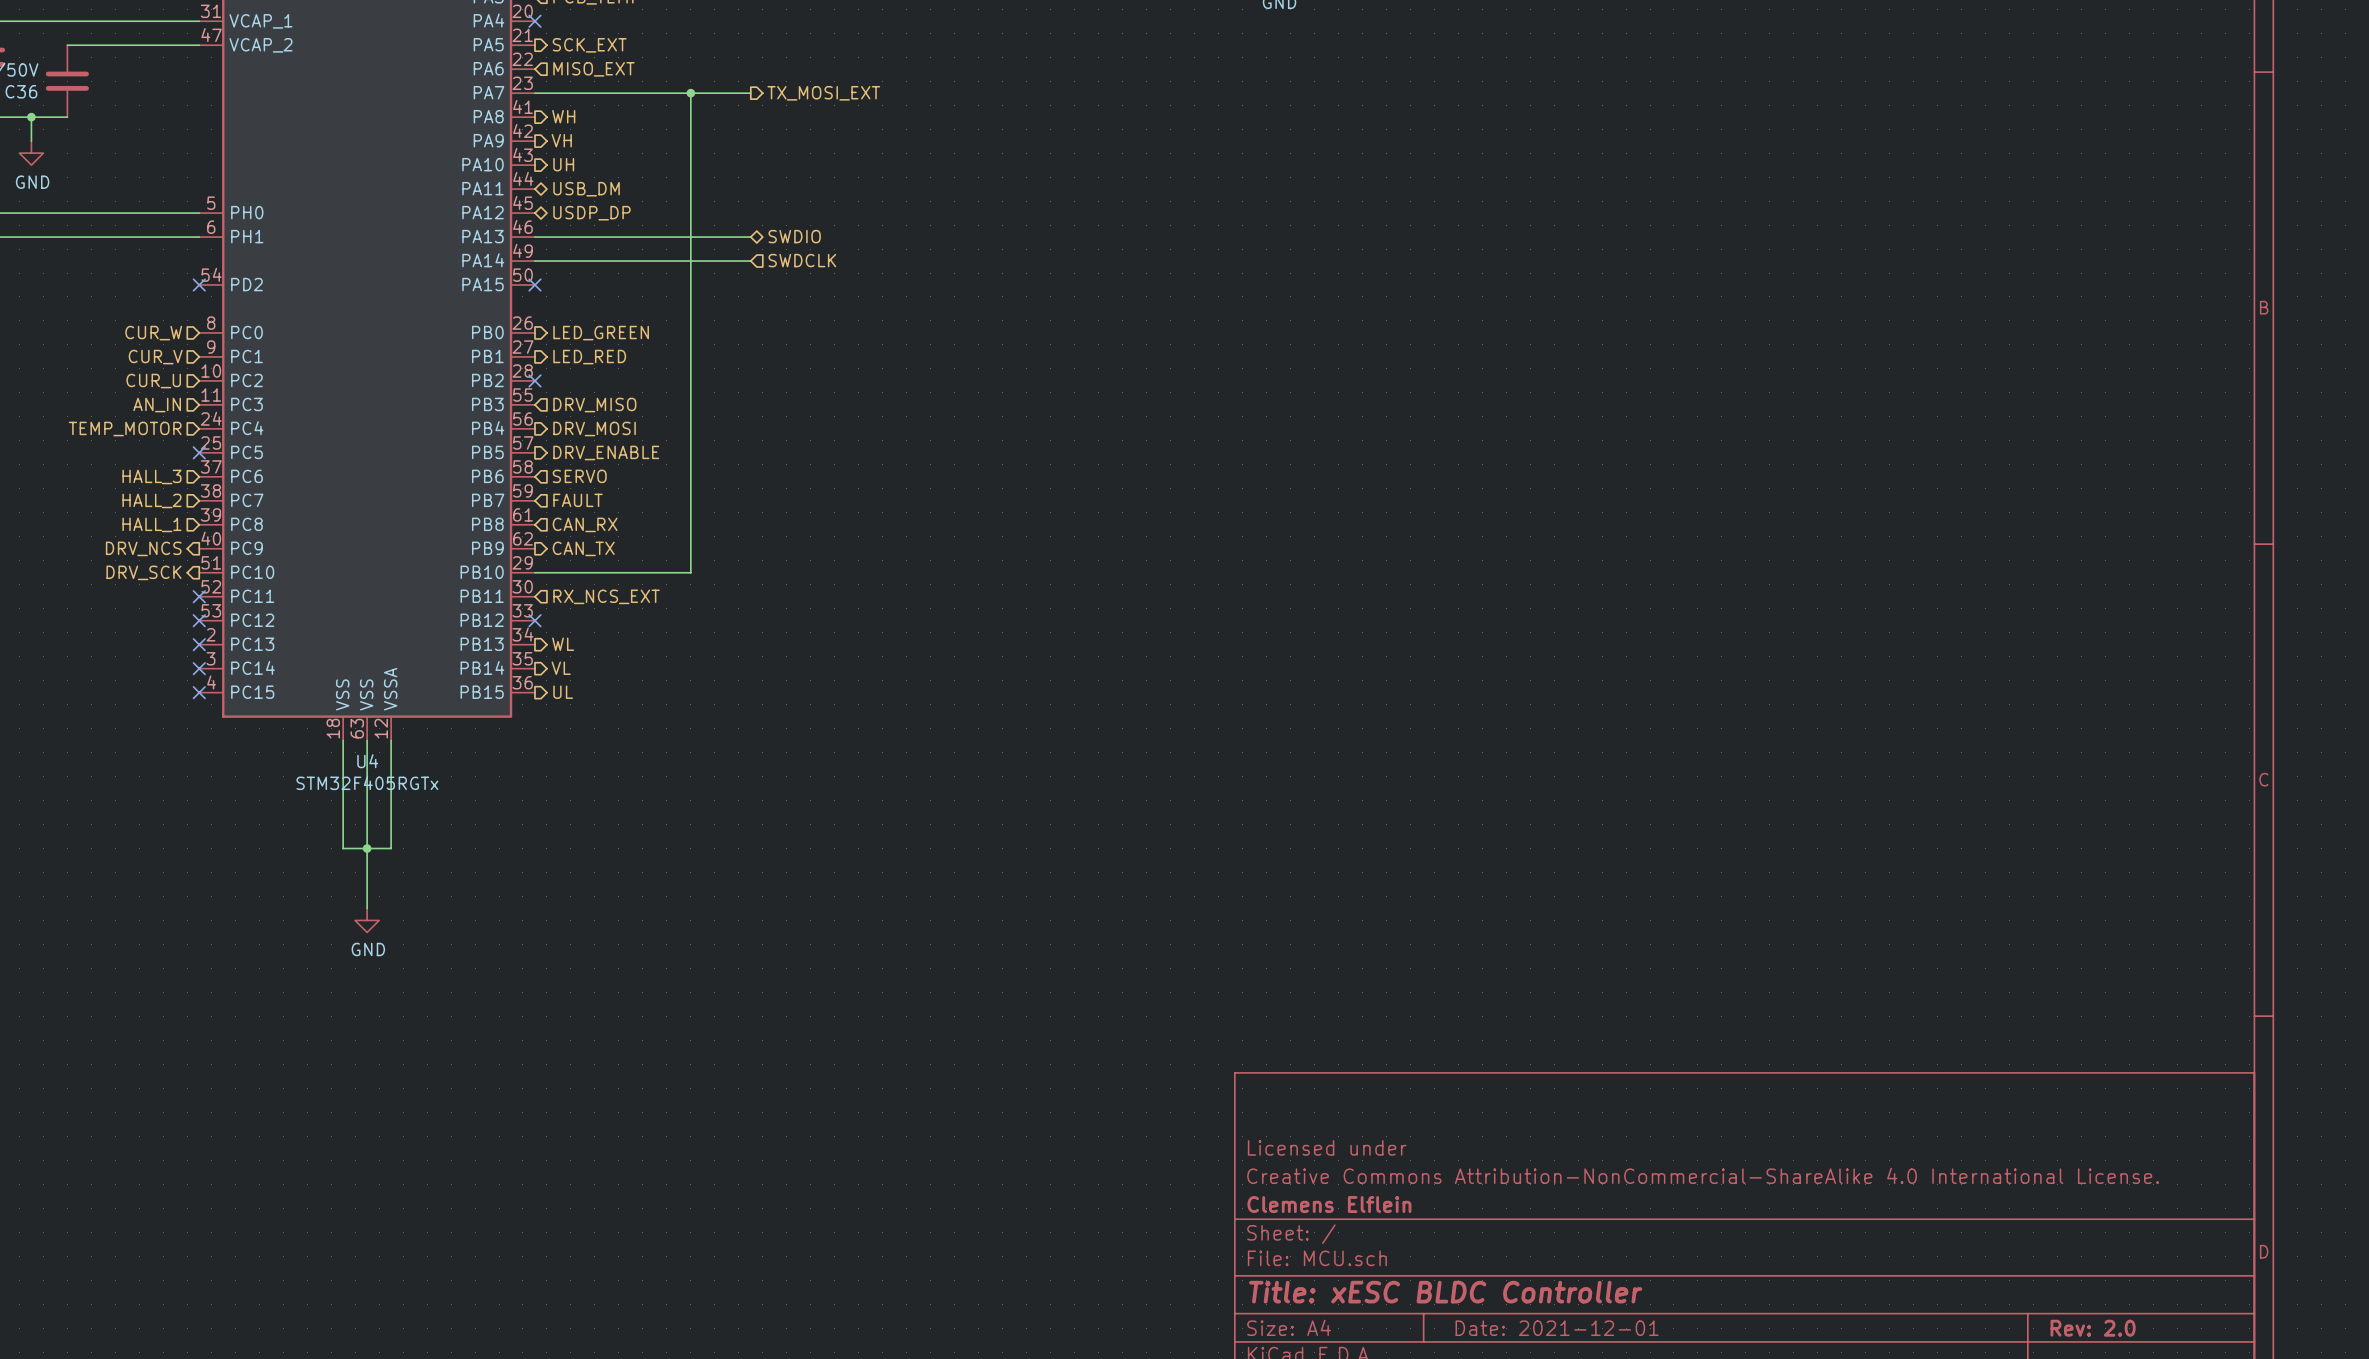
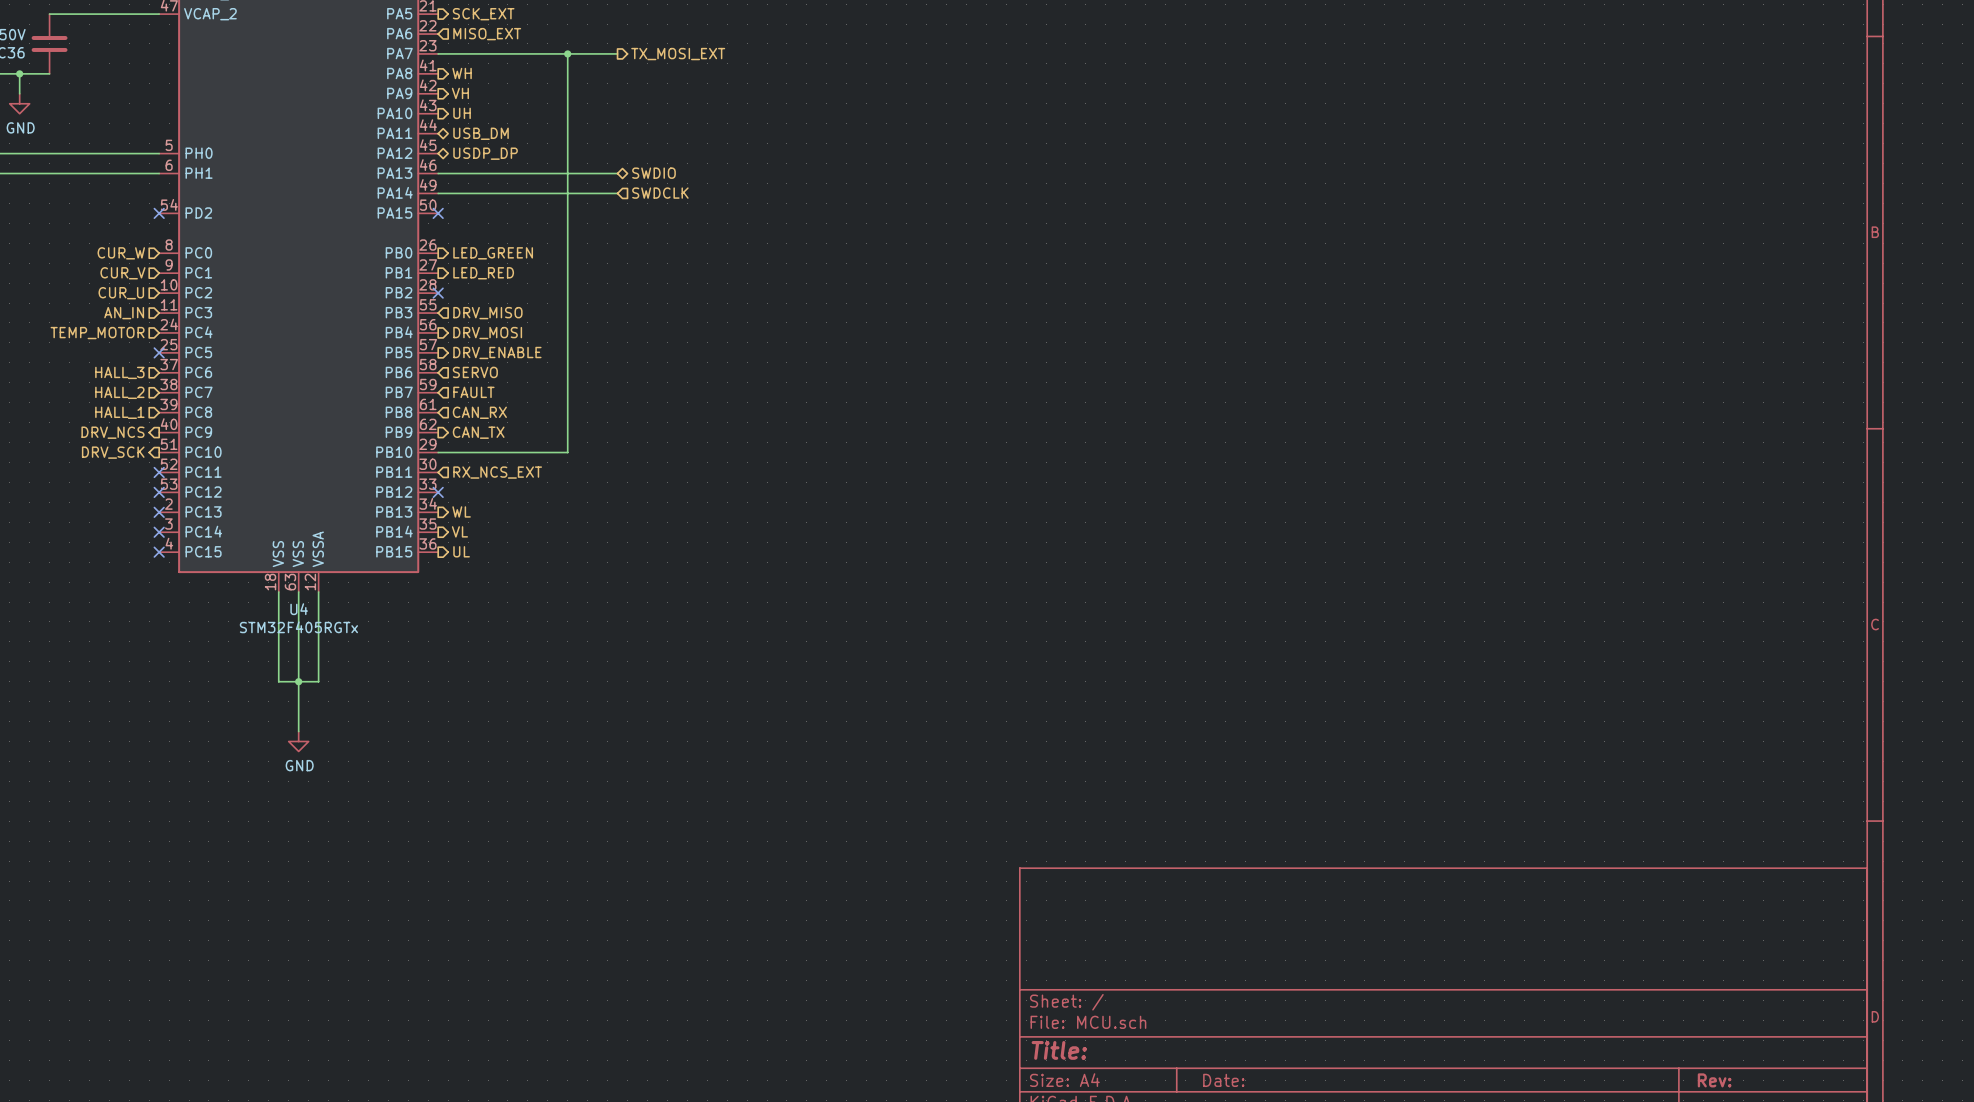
title block: Licensed under (1327, 1147) -> none
title block: Creative Commons Attribution-NonCommercial-ShareAlike 4.0 International License. (1703, 1175) -> none
title block: Clemens Elflein (1329, 1204) -> none
title block: Title: xESC BLDC Controller (1445, 1292) -> Title: (1059, 1050)
title block: Date: 2021-12-01 (1557, 1328) -> Date: (1223, 1080)
title block: Rev: 2.0 (2093, 1328) -> Rev: (1714, 1080)

